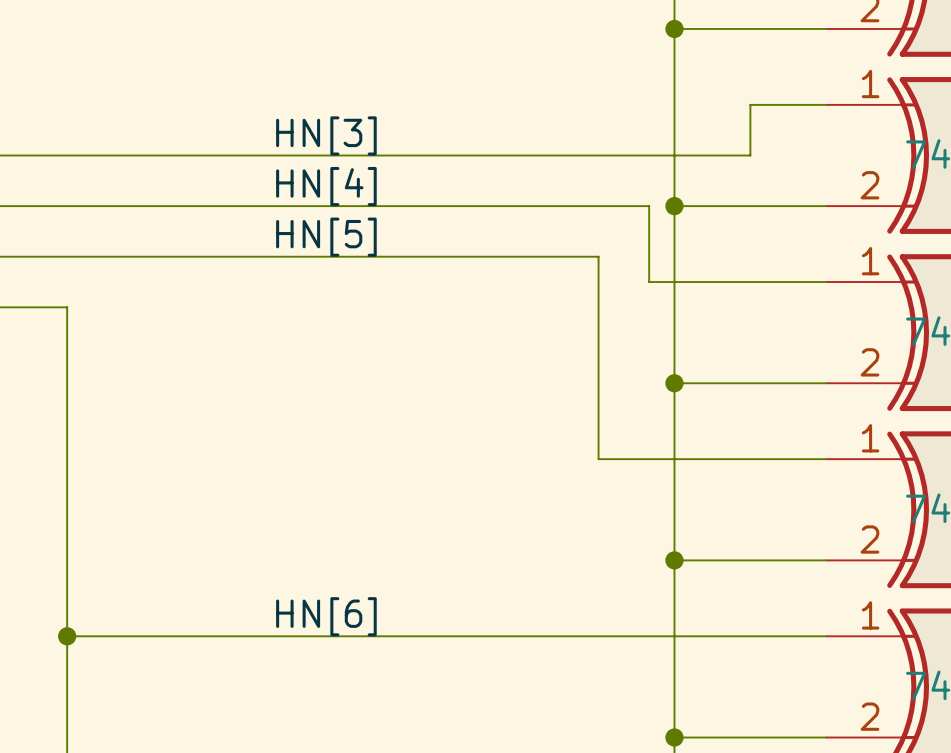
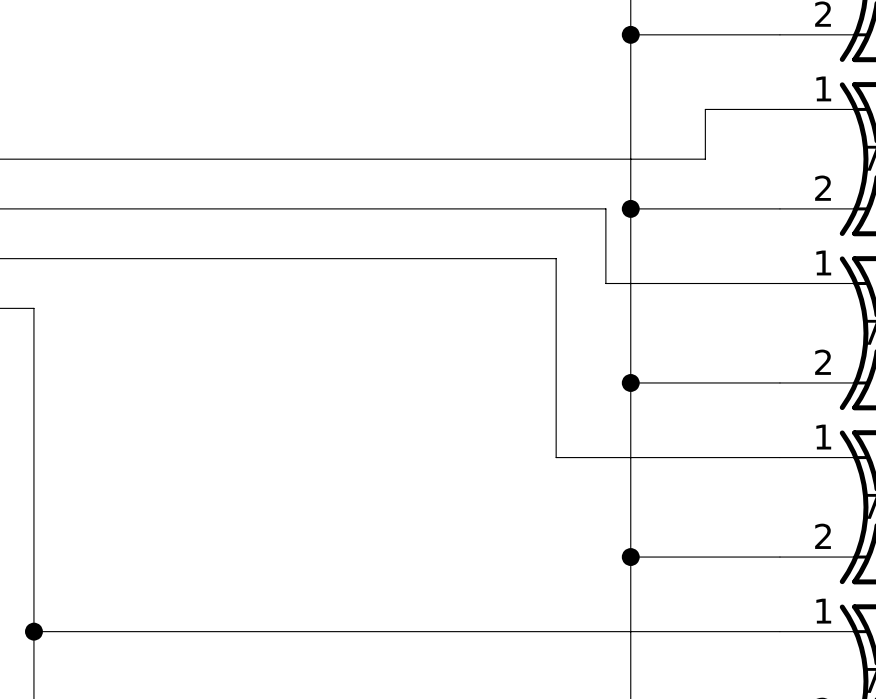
label: HN[3] (326, 135) -> none
label: HN[4] (326, 186) -> none
label: HN[5] (326, 237) -> none
label: HN[6] (326, 616) -> none

